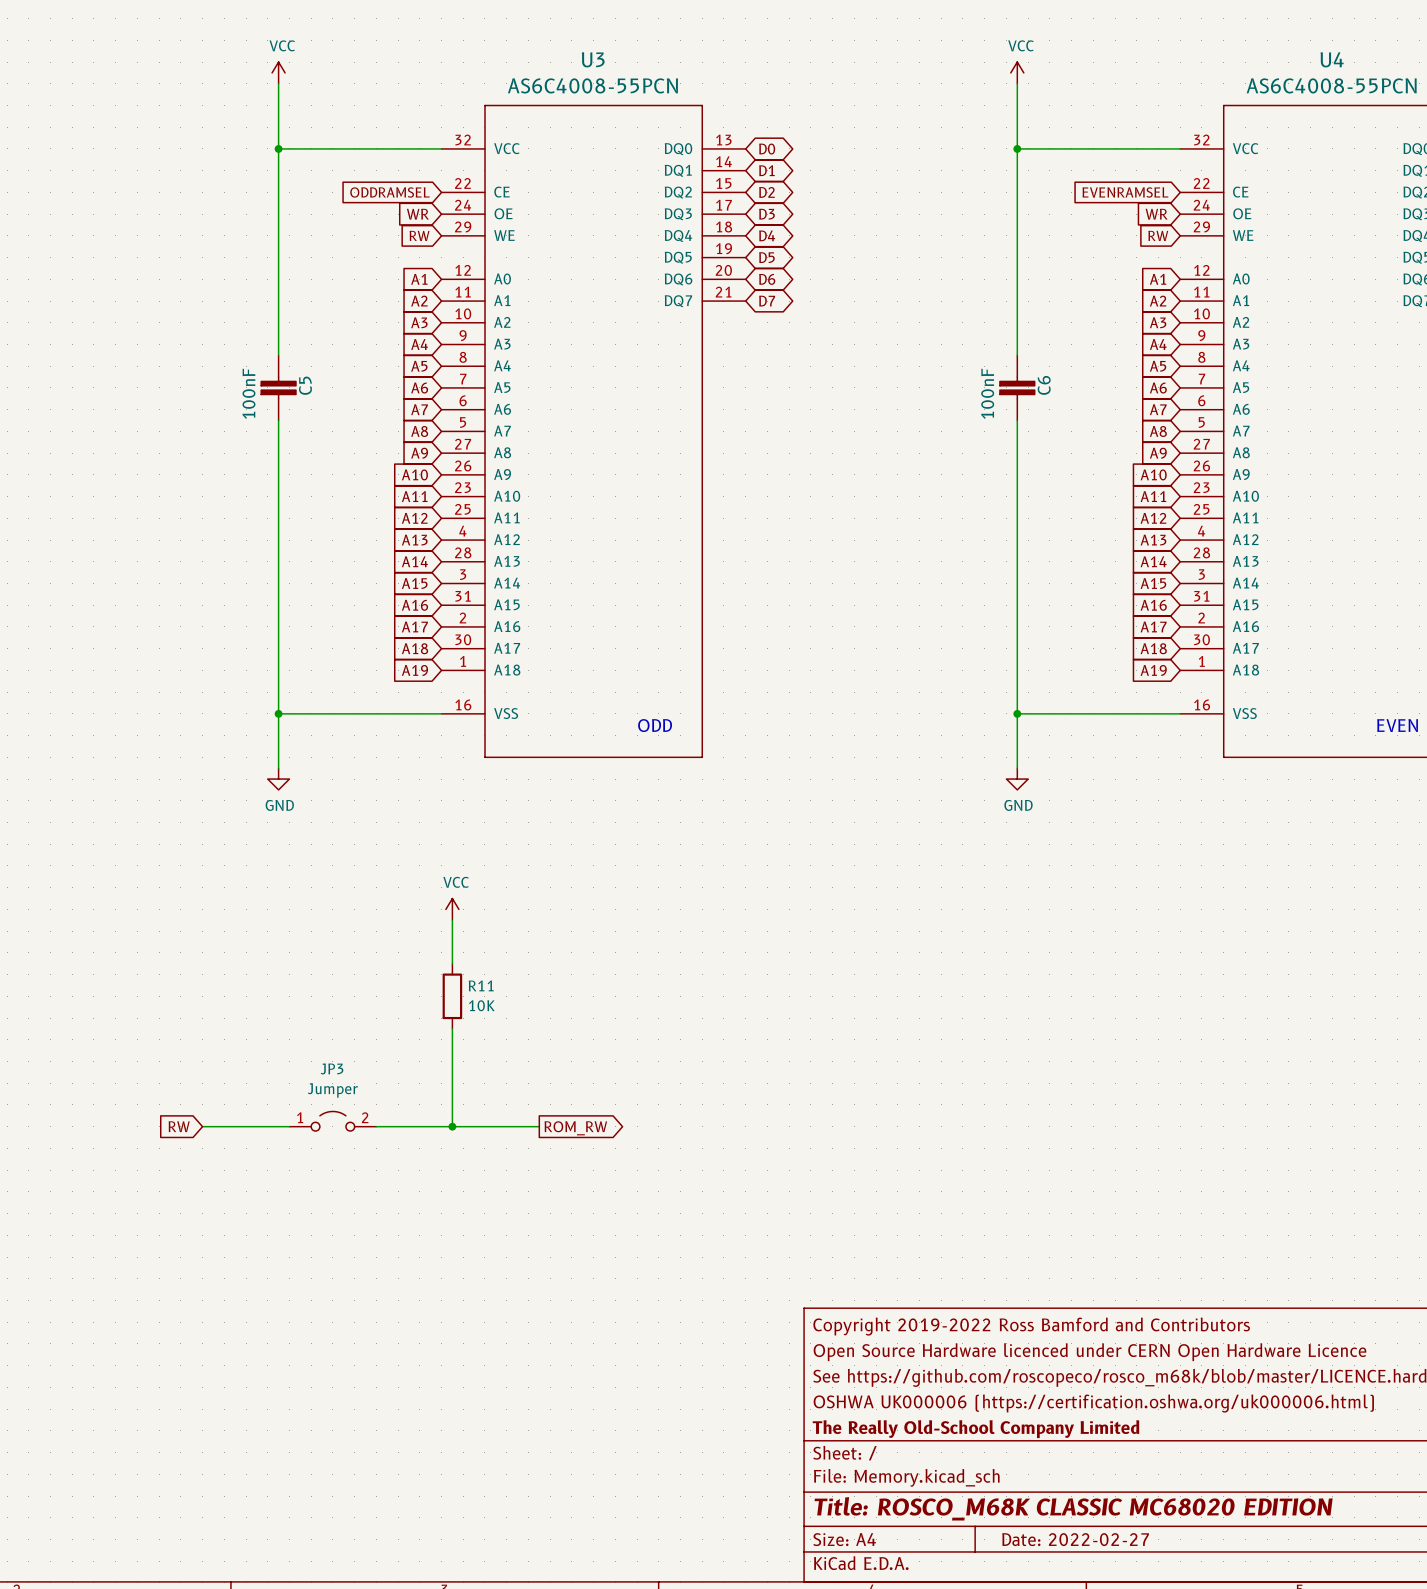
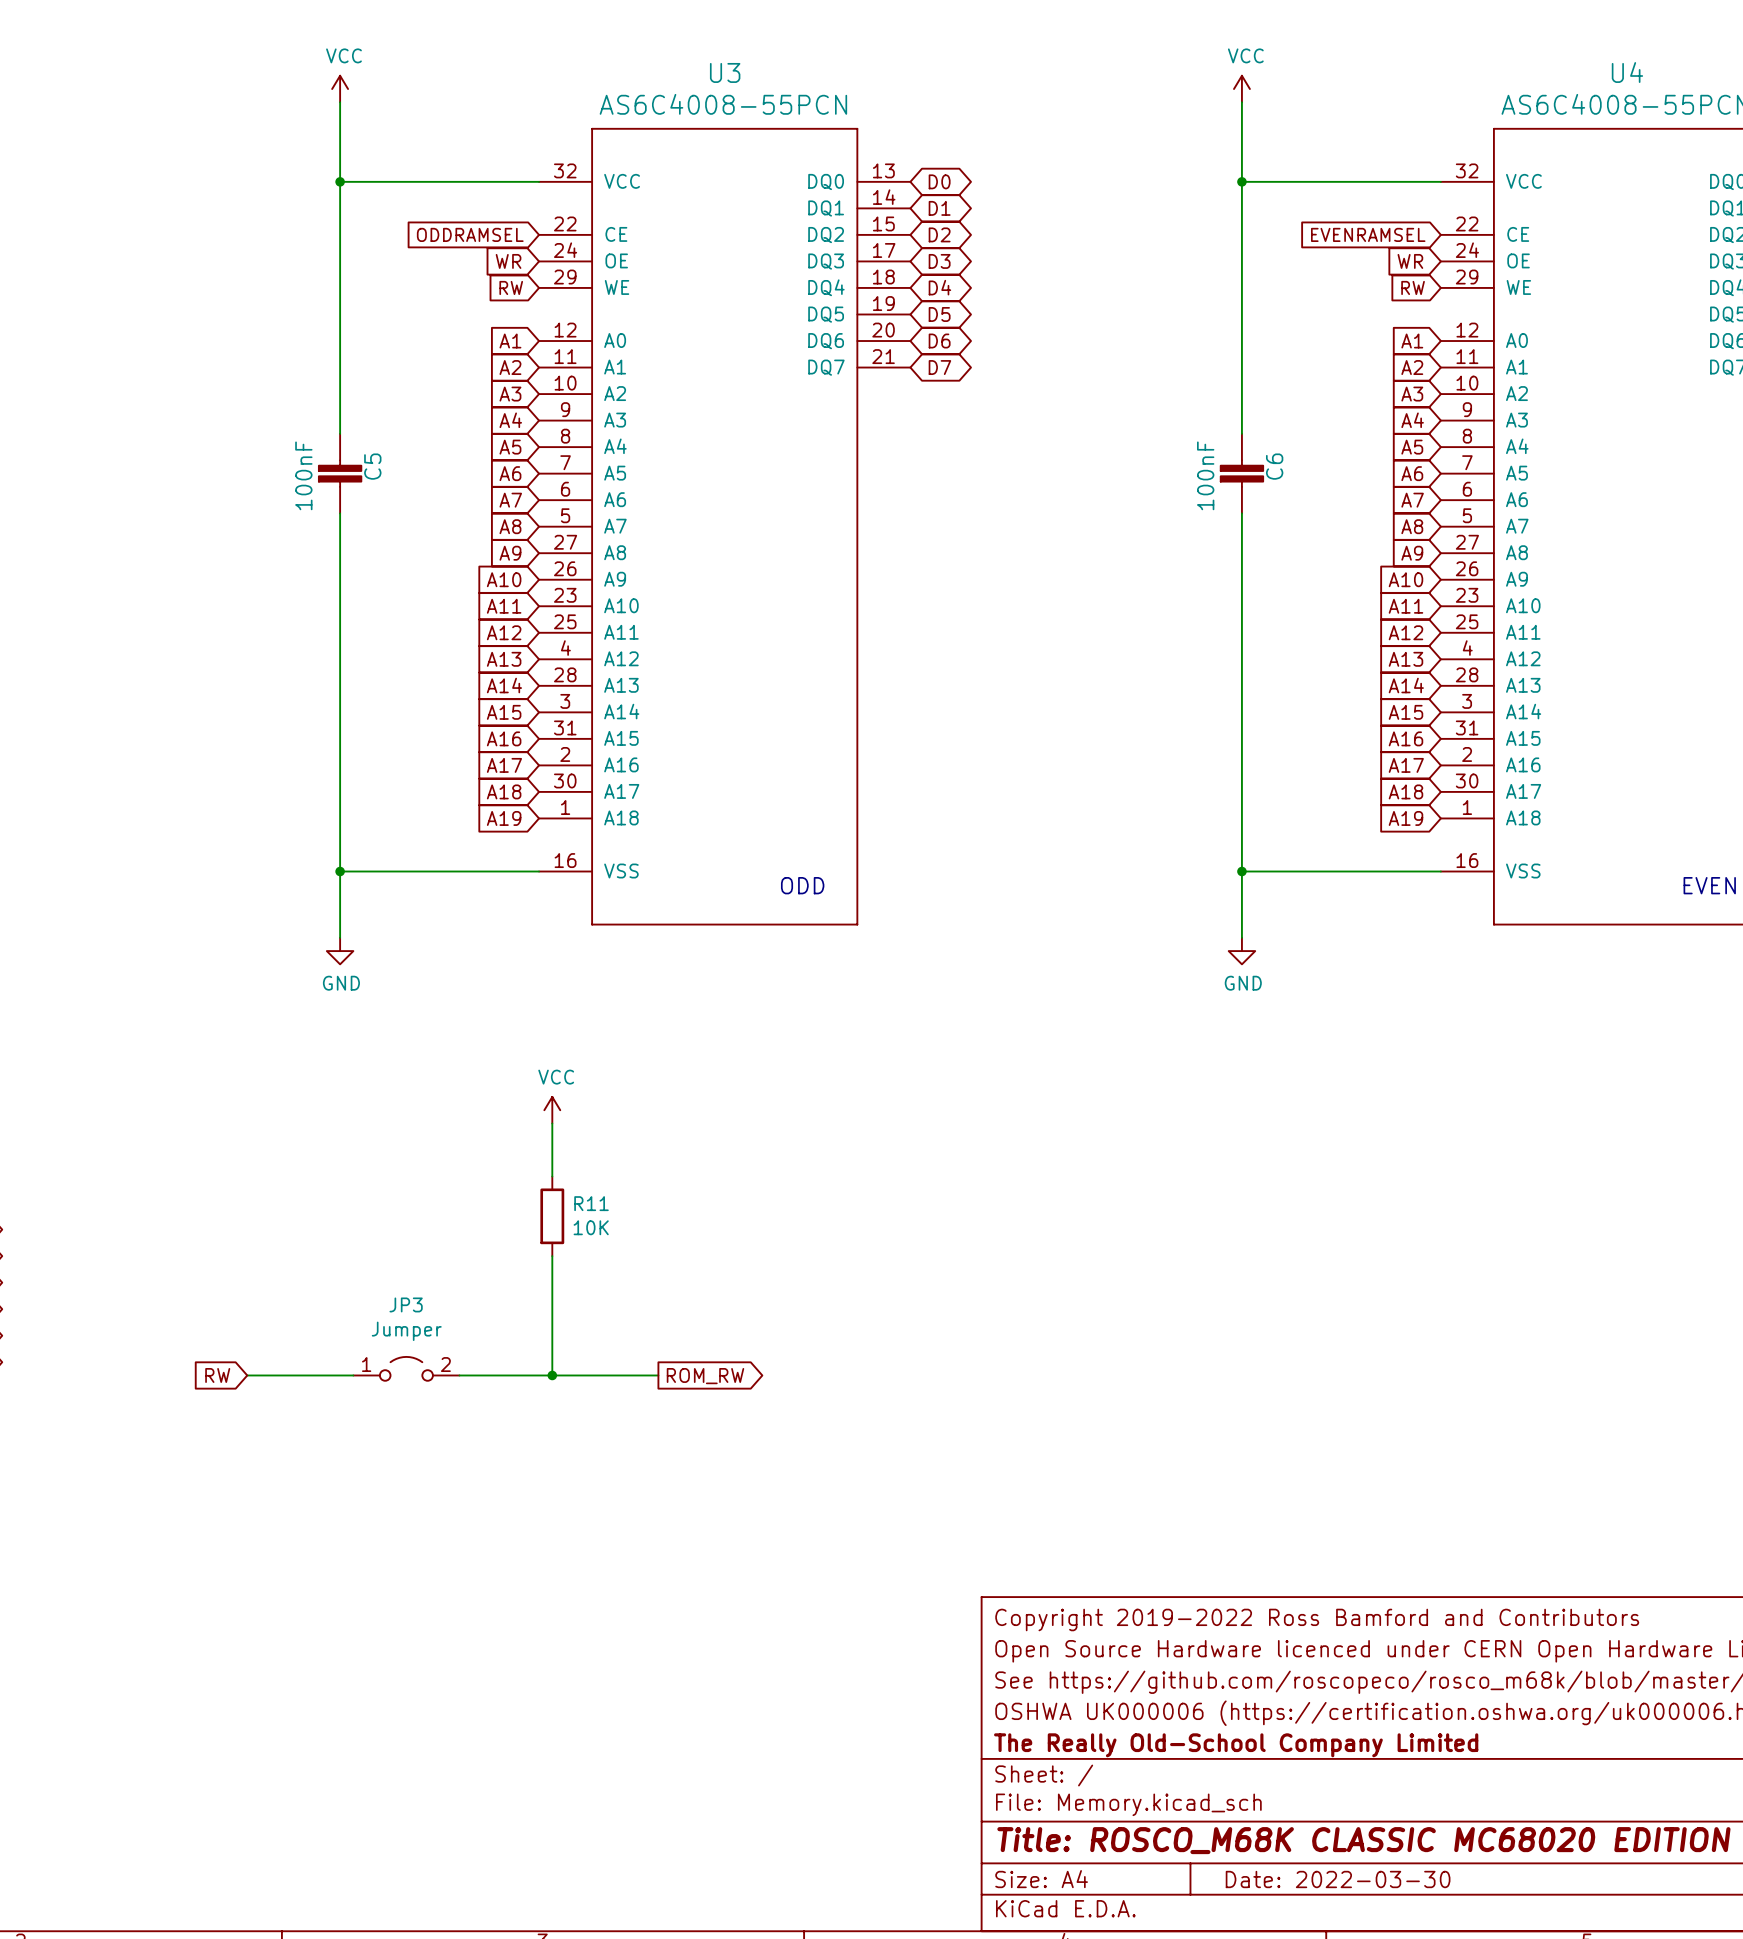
title block: Date: 2022-02-27 (1075, 1539) -> Date: 2022-03-30 (1338, 1879)

